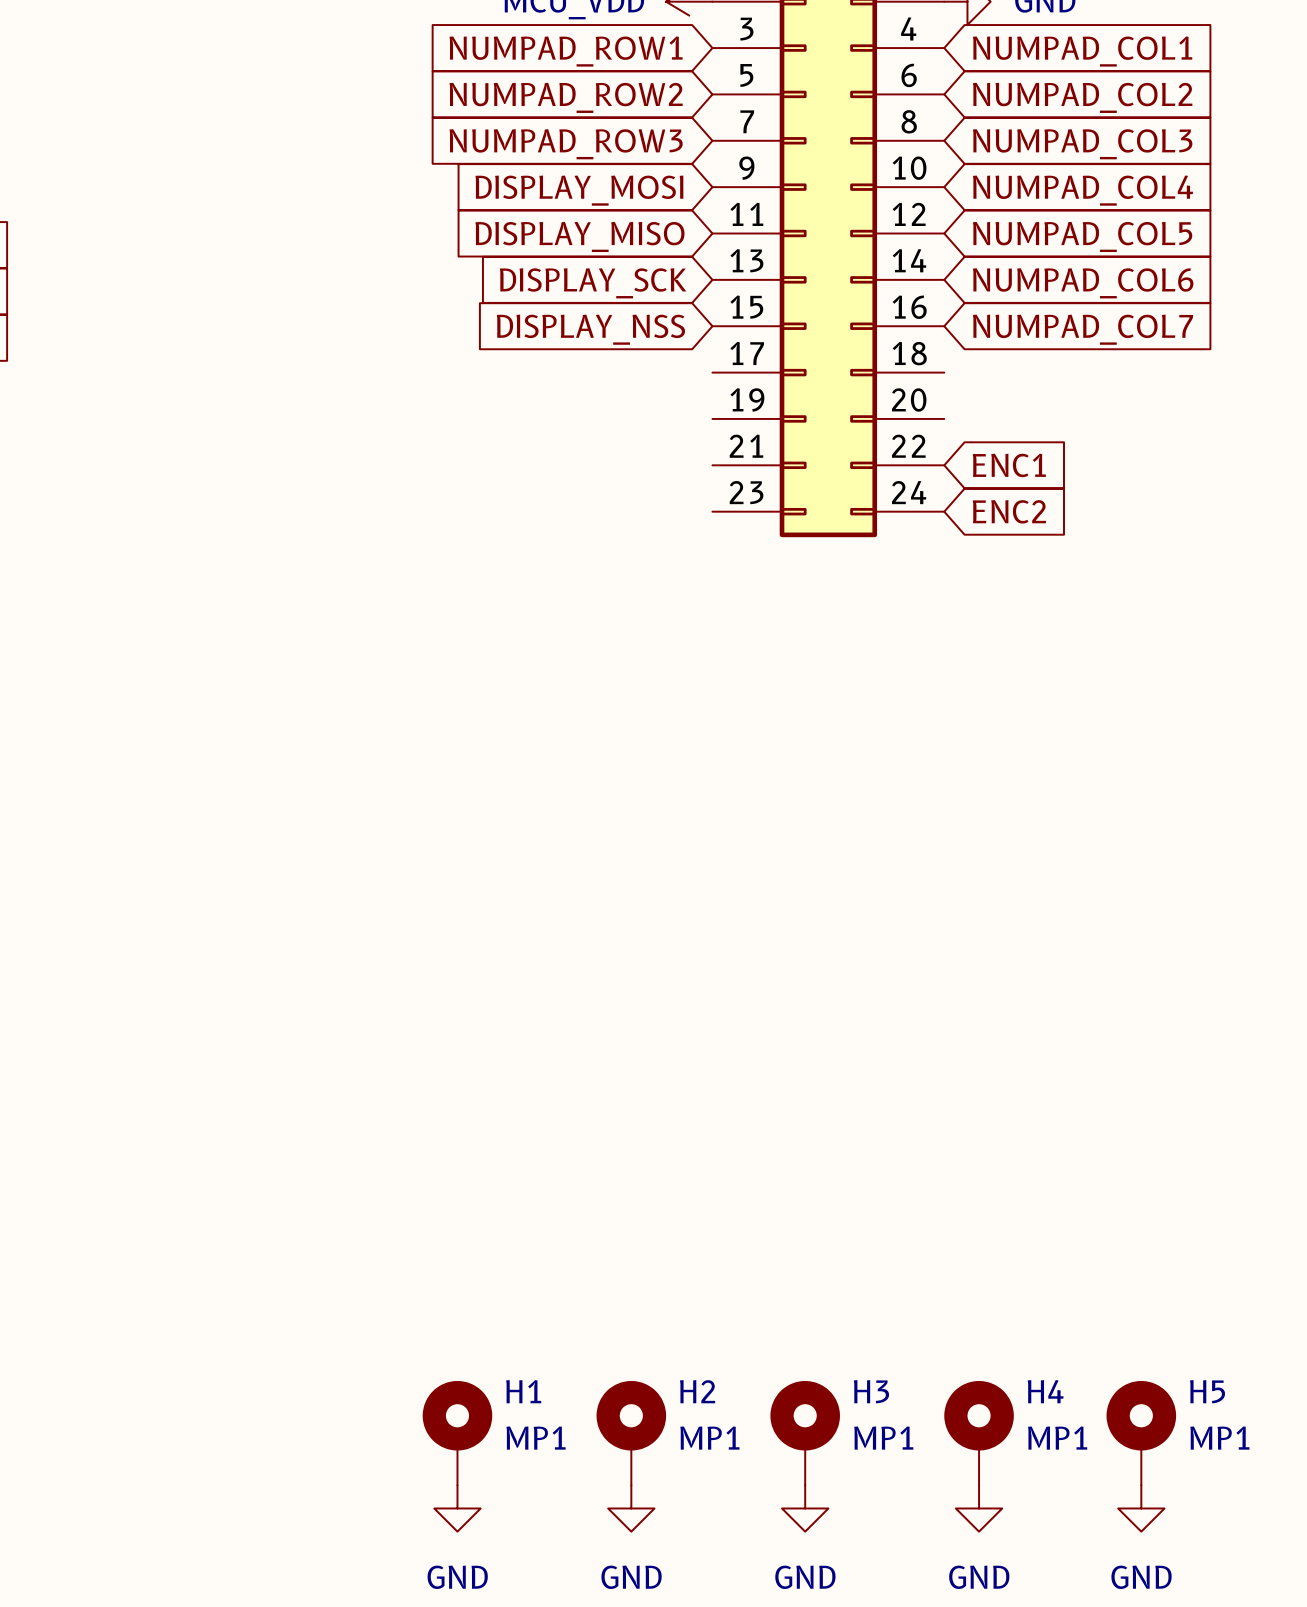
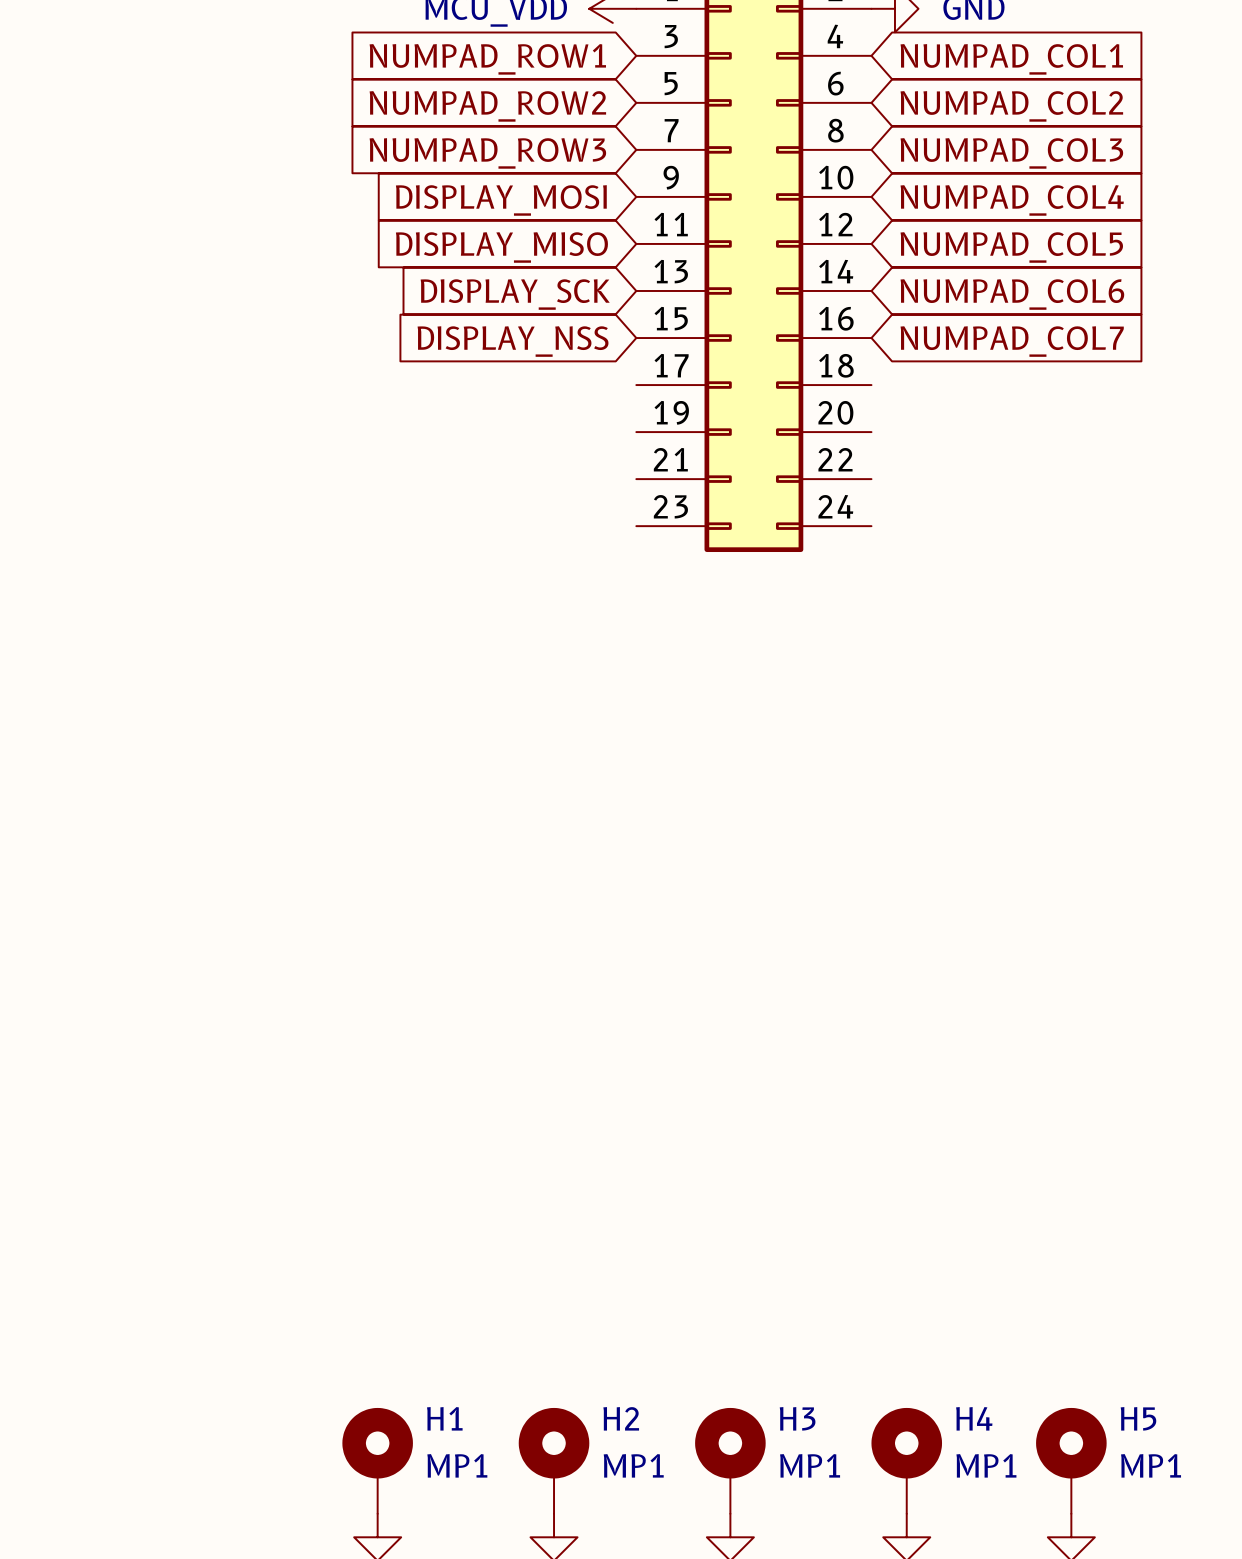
global label: ENC1 (1009, 465) -> none
global label: ENC2 (1009, 511) -> none

